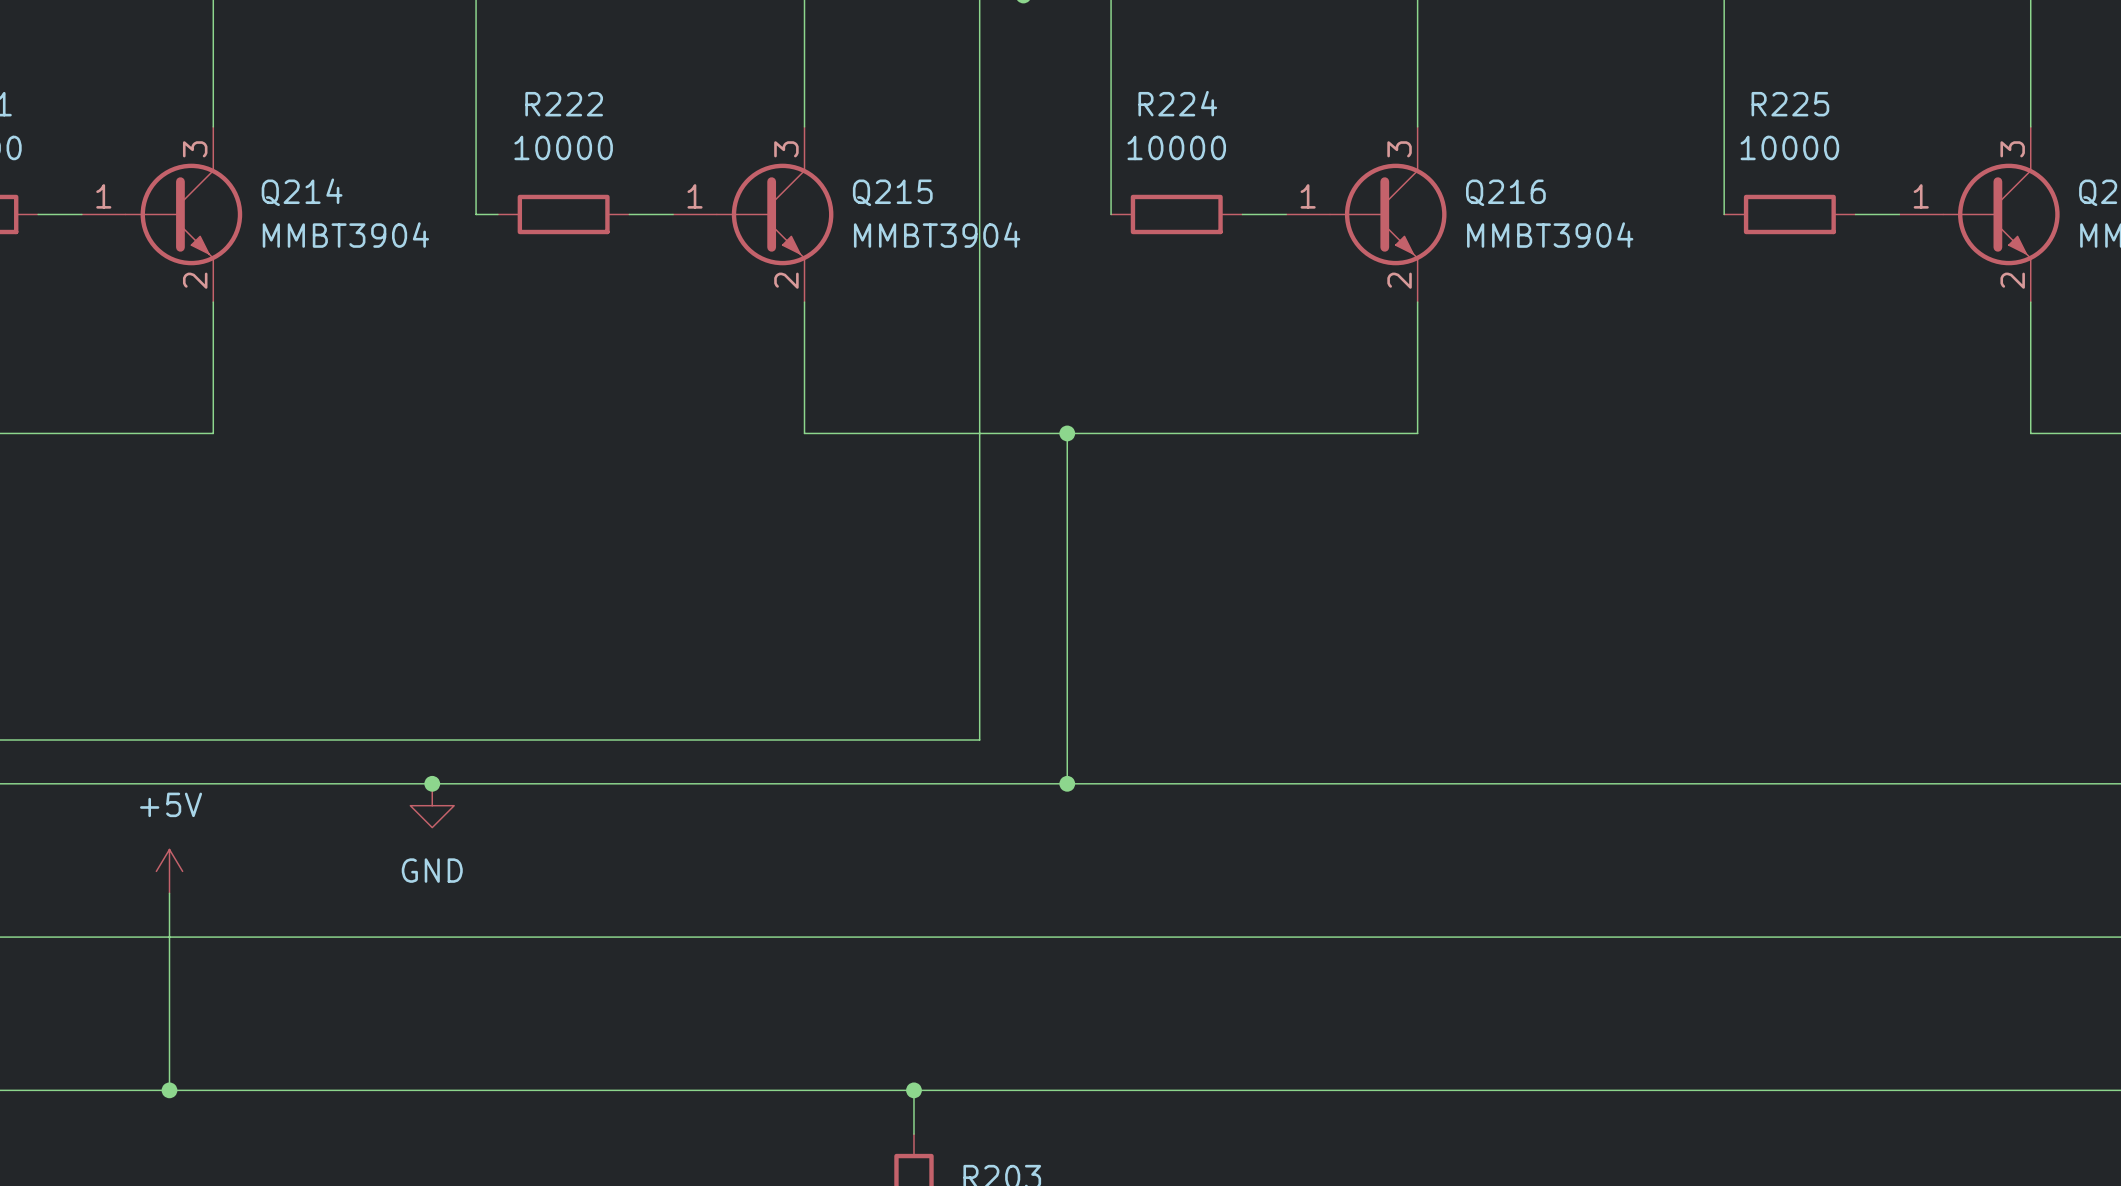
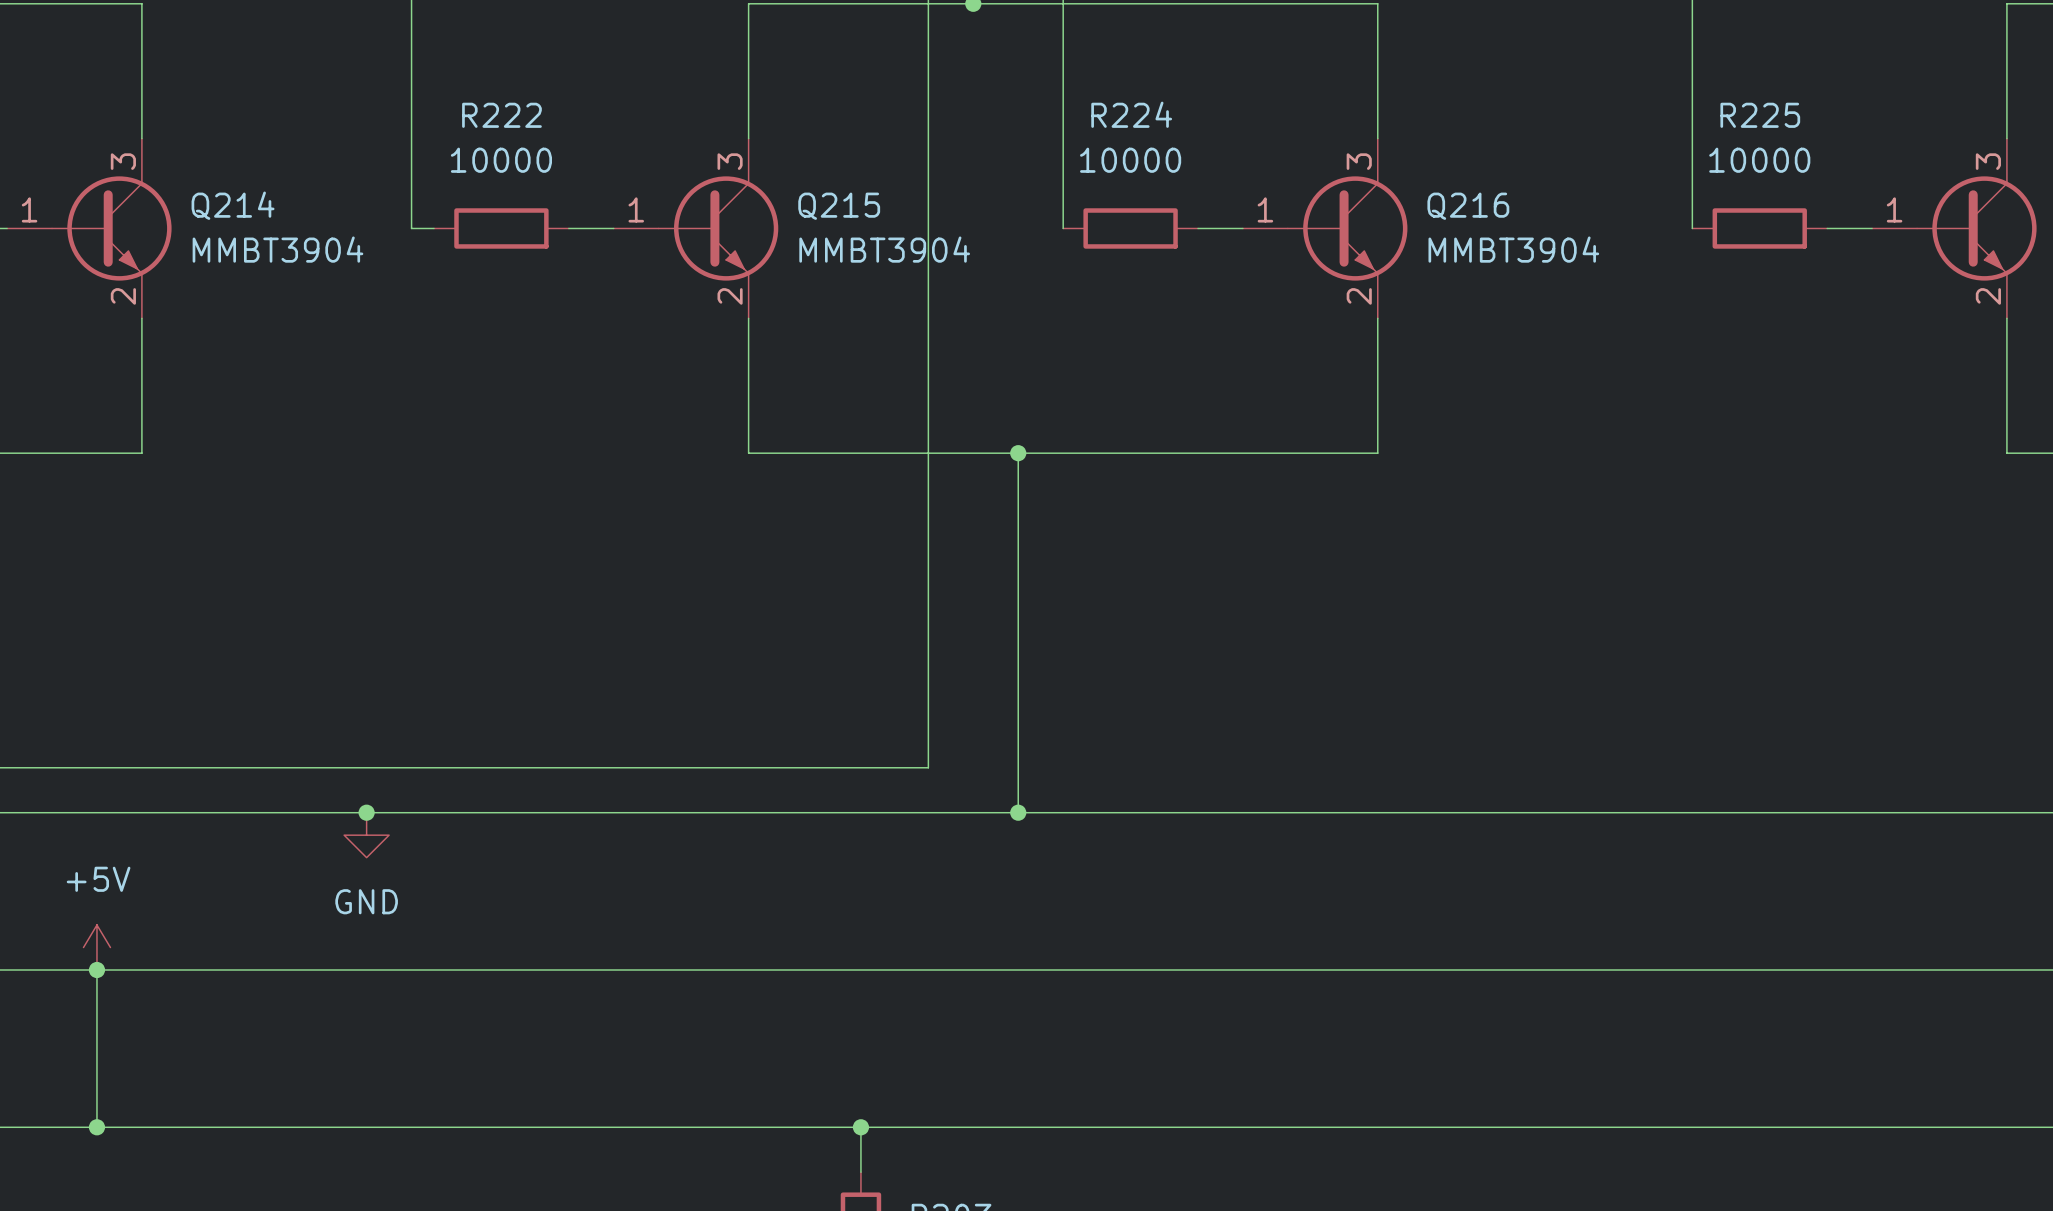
power symbol position: +5V (169, 871) -> +5V (96, 947)
junction: none -> (96, 969)

